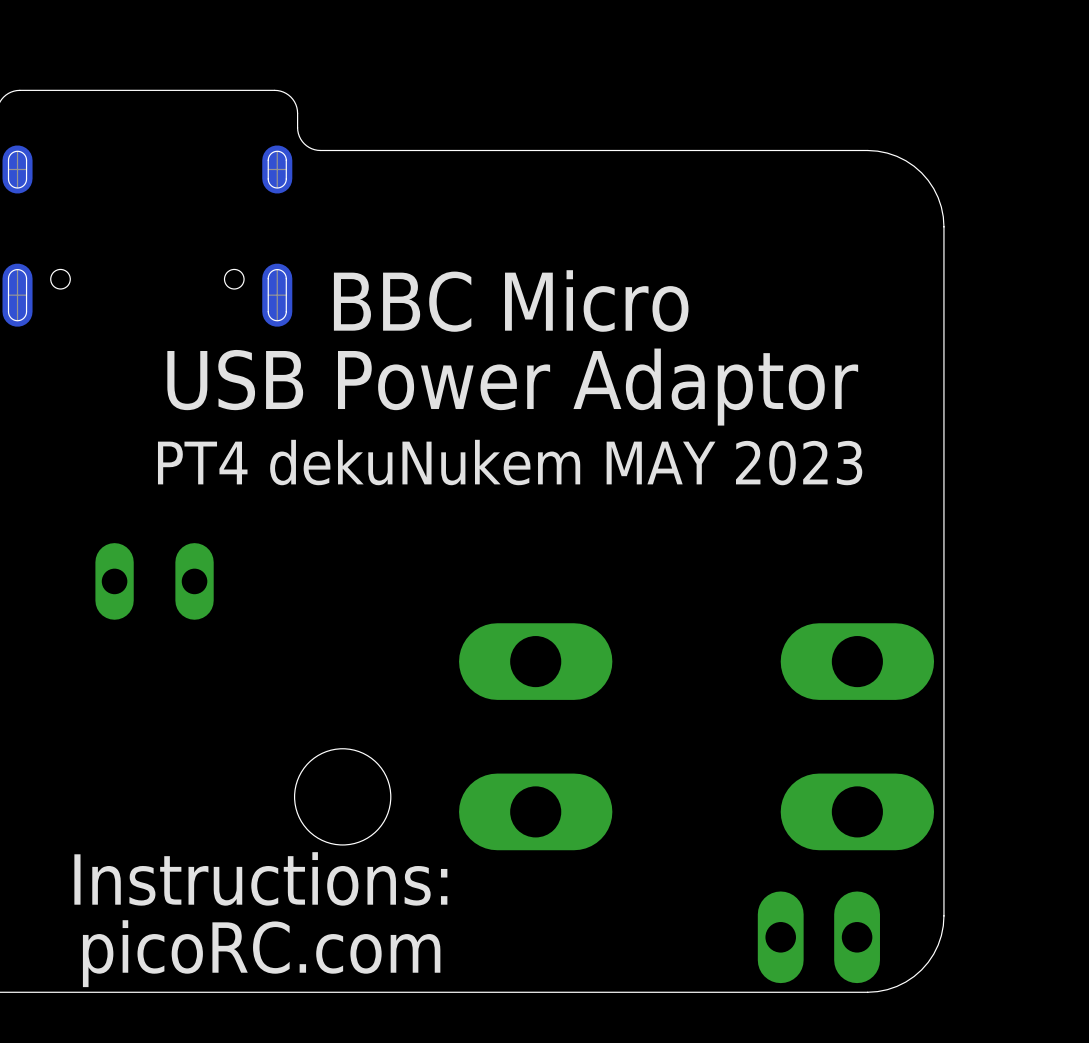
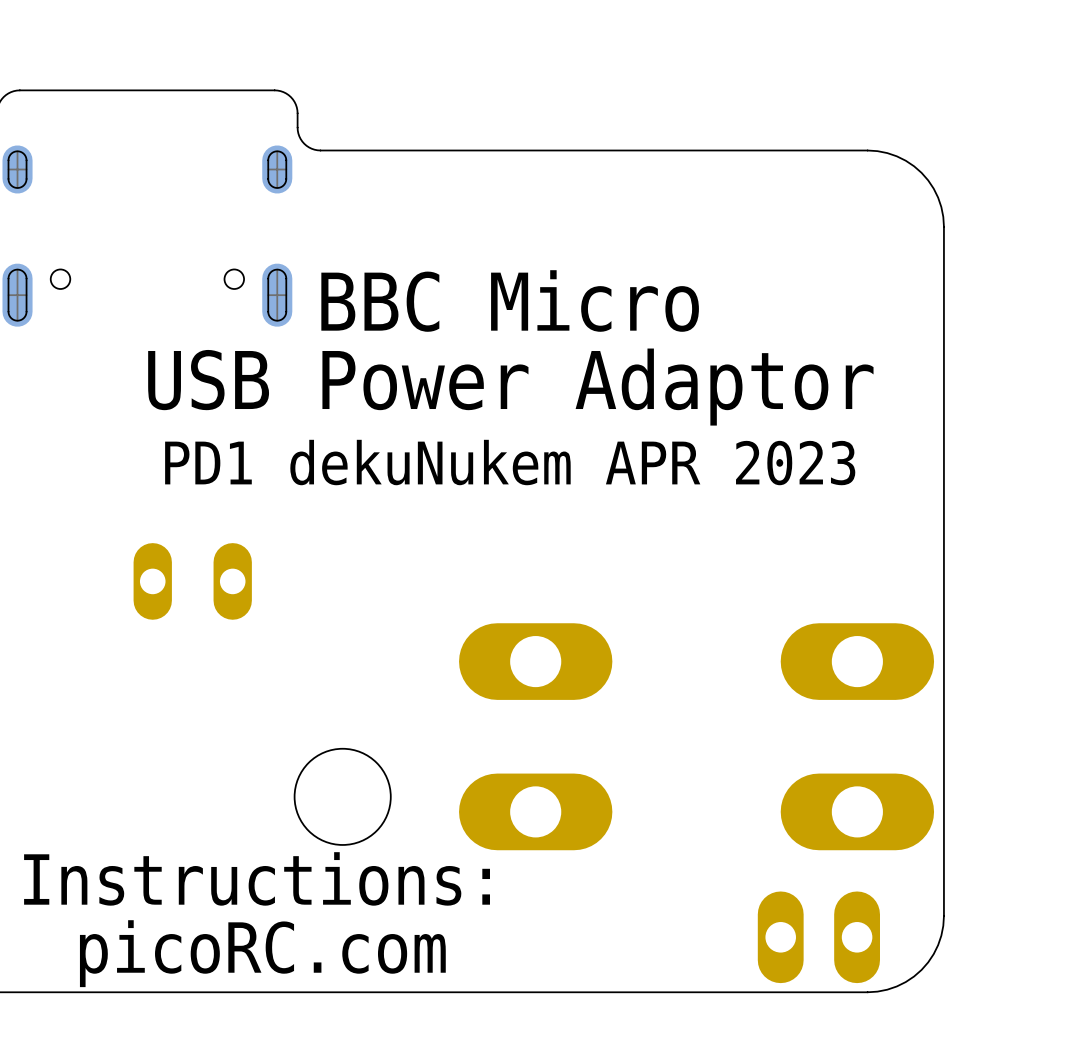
text: PT4 dekuNukem MAY 2023 (510, 462) -> PD1 dekuNukem APR 2023 (510, 462)
part position: (154, 581) -> (192, 581)

